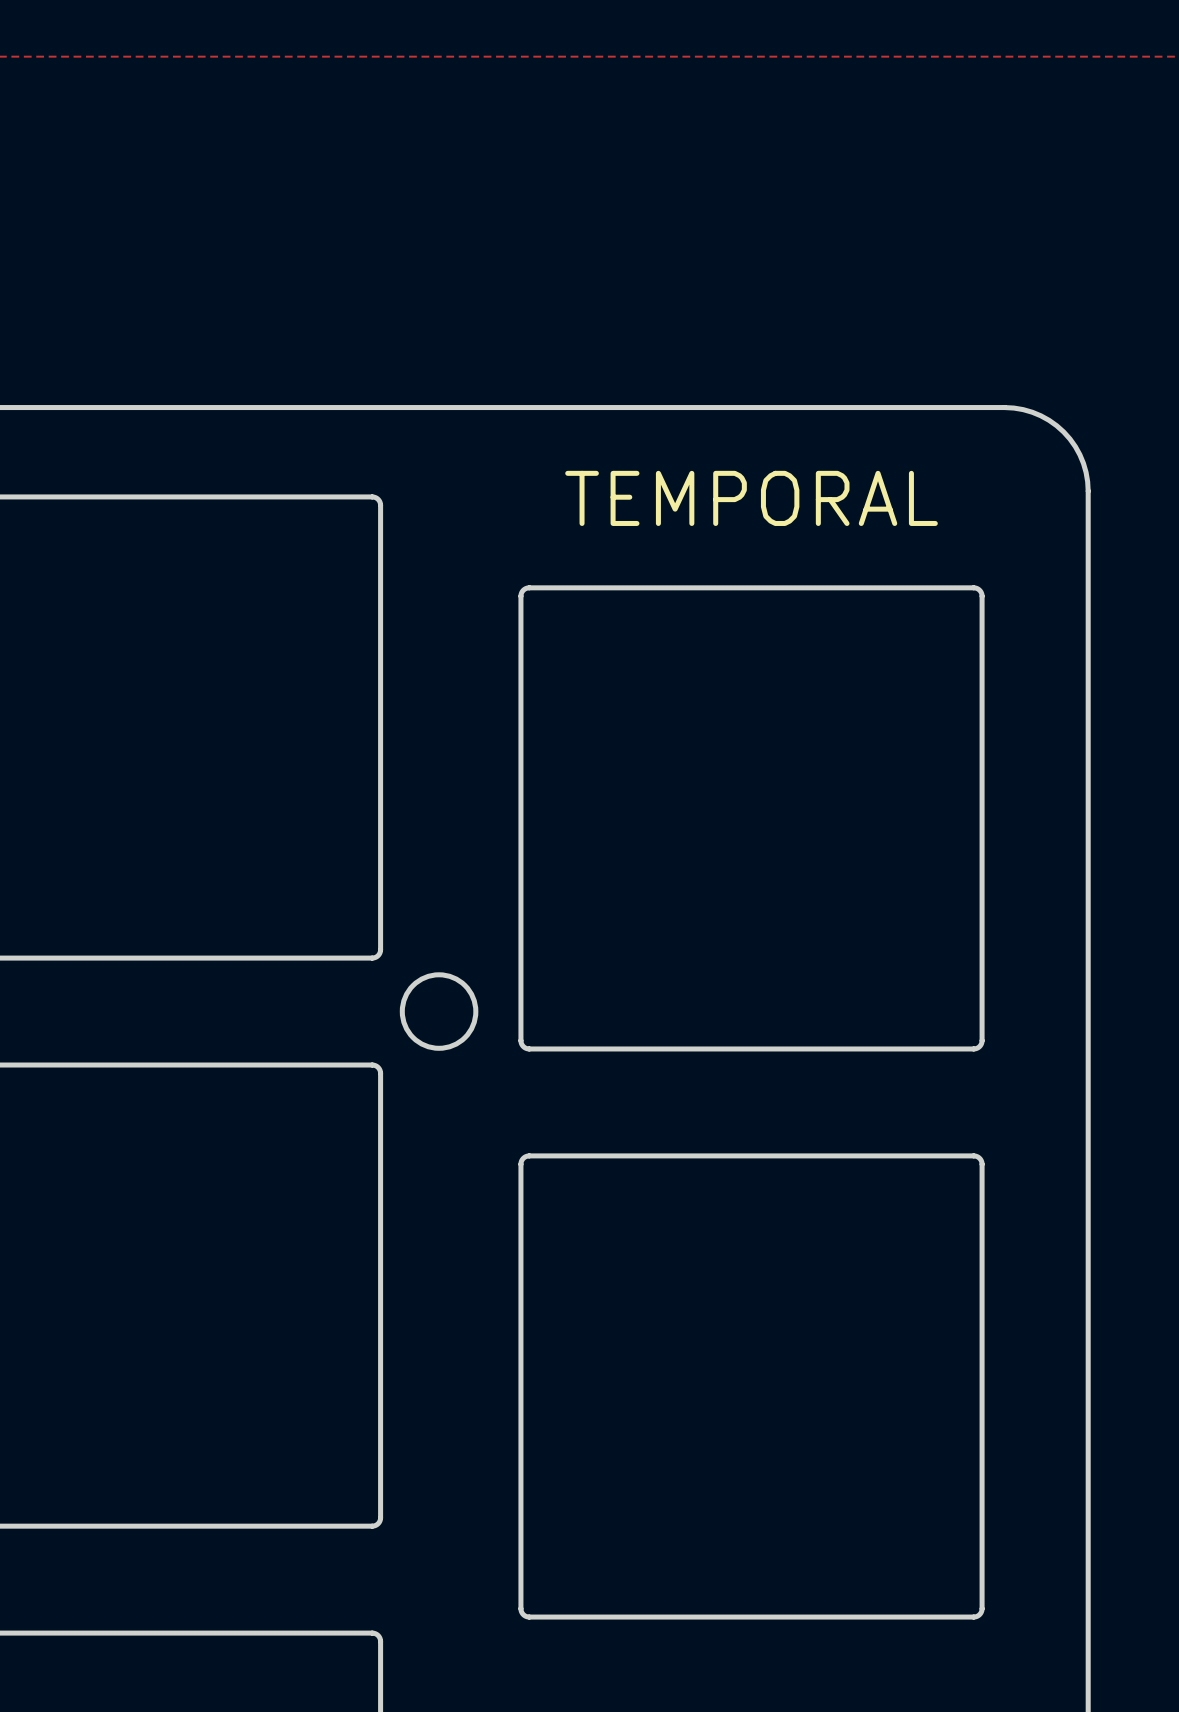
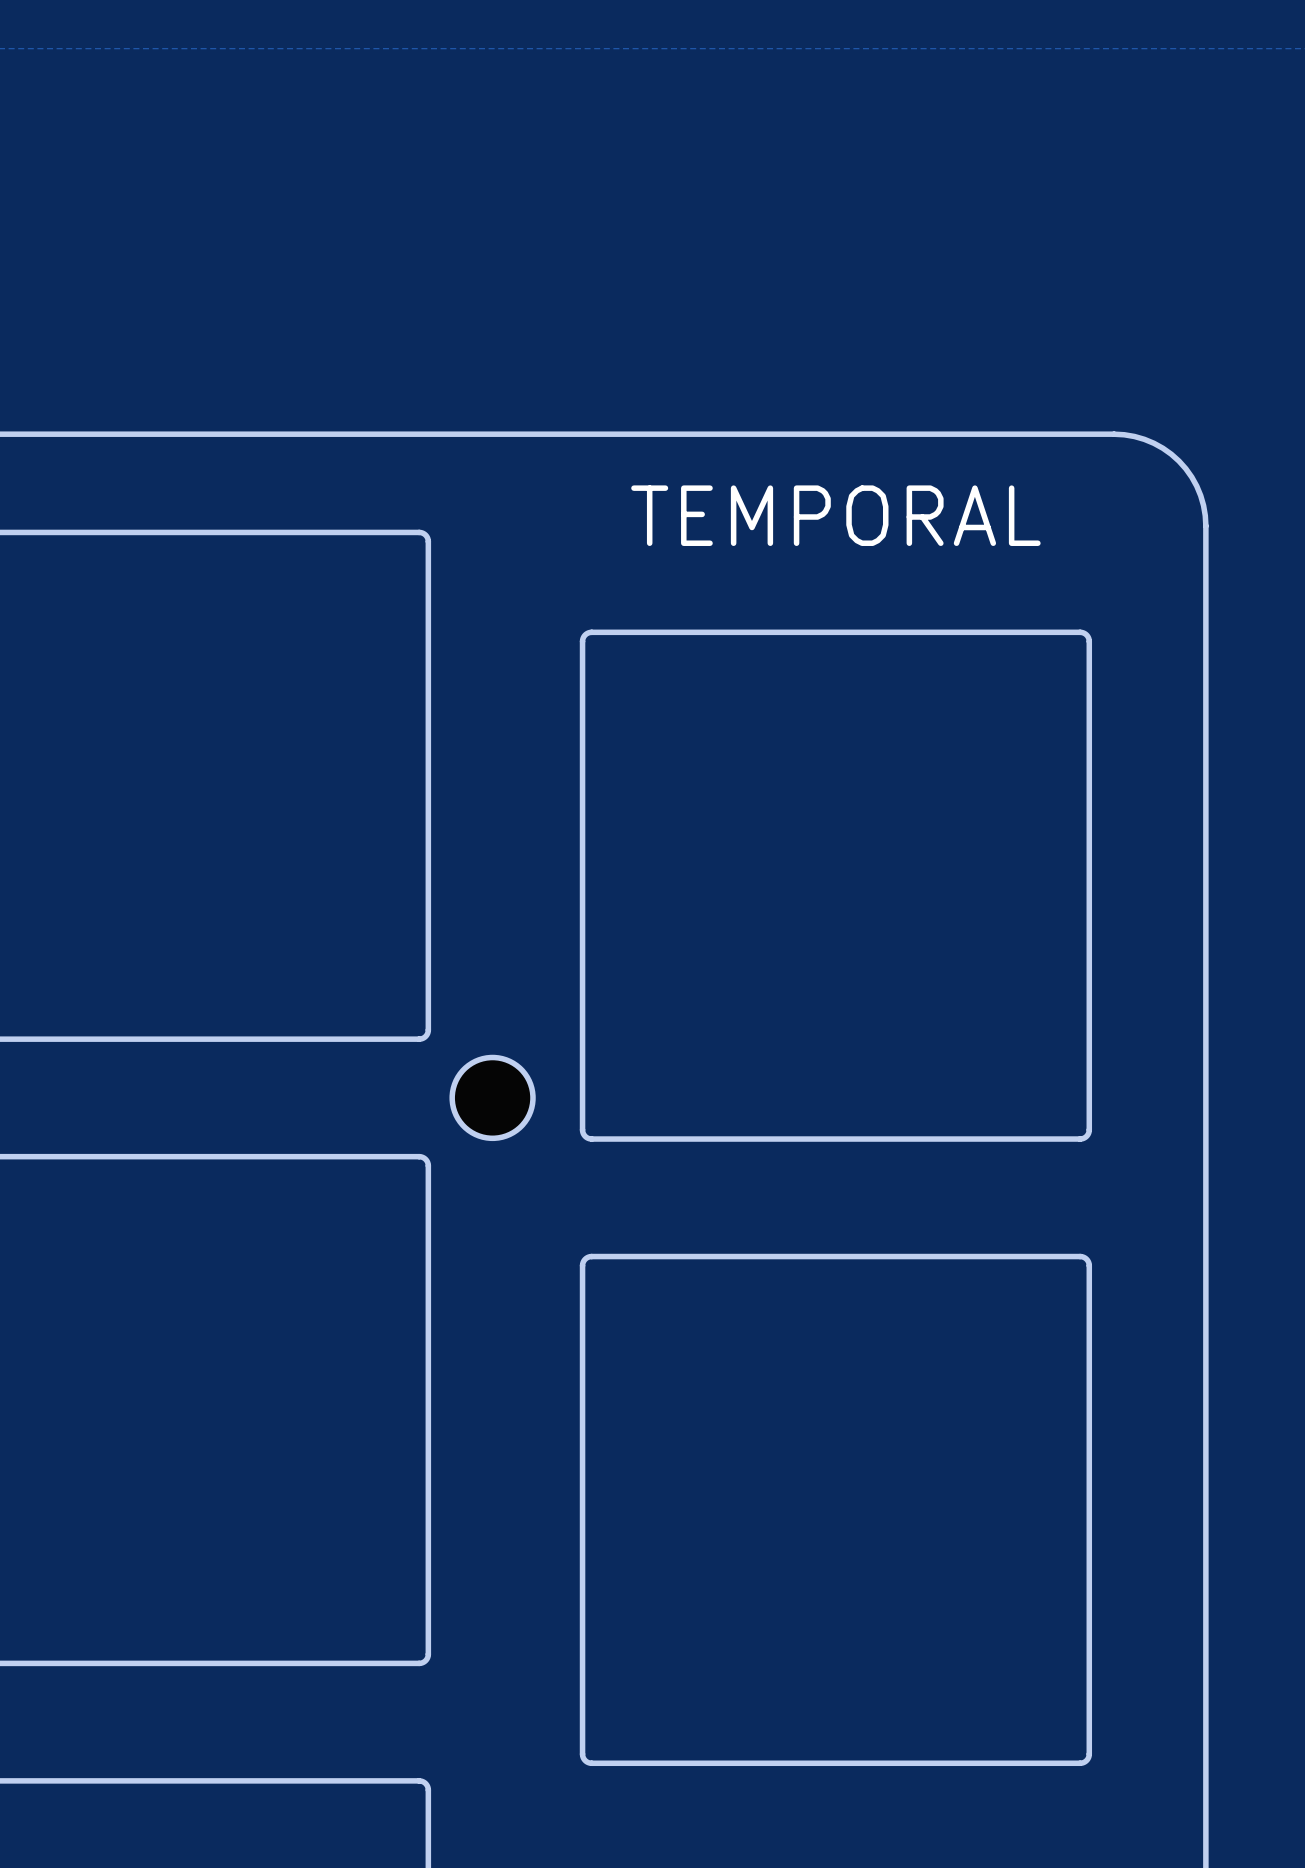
text position: TEMPORAL (751, 498) -> TEMPORAL (835, 515)

